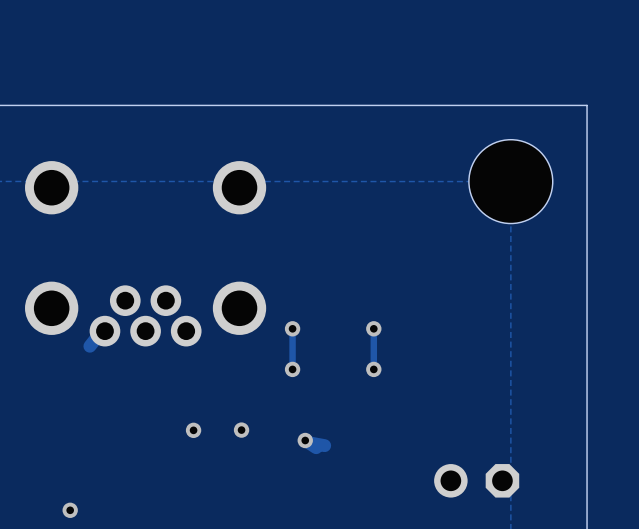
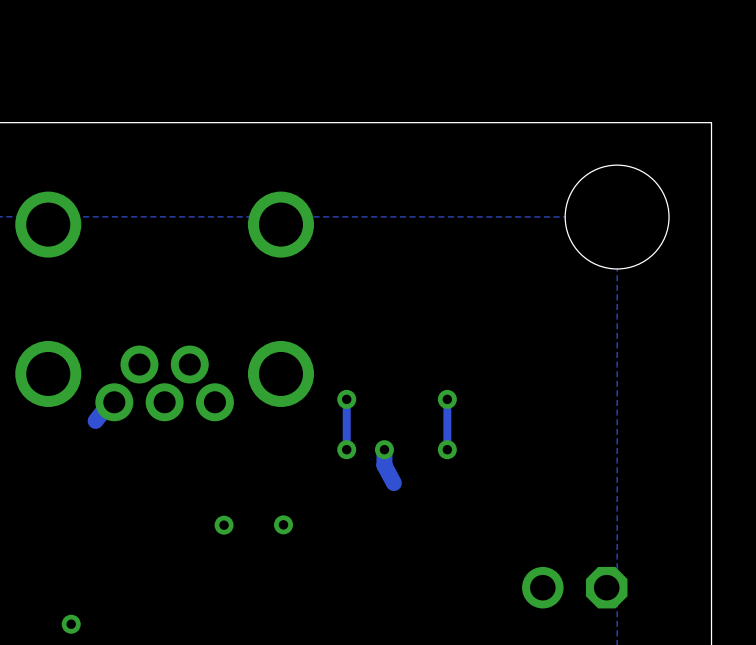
track: none -> (384, 449) (384, 465) (393, 483)
via position: (305, 440) -> (384, 449)
track: (324, 445) (305, 440) (316, 447) -> none

